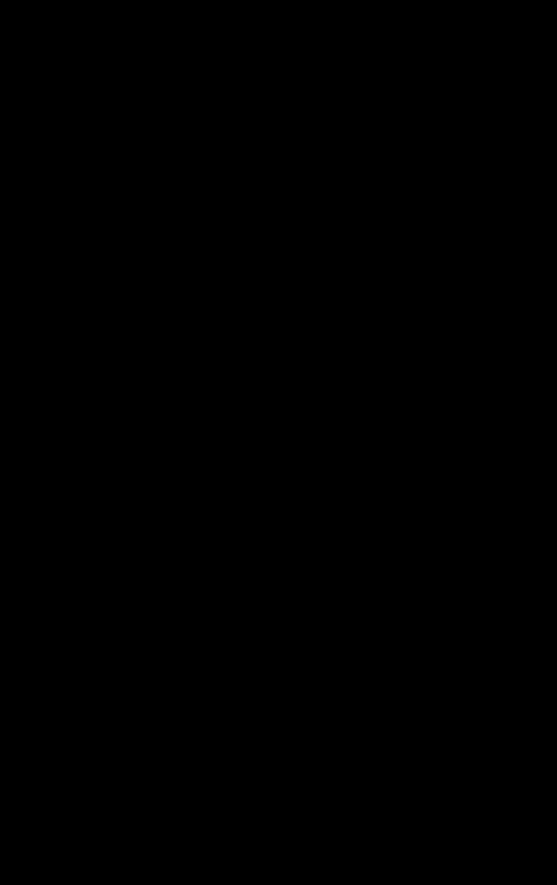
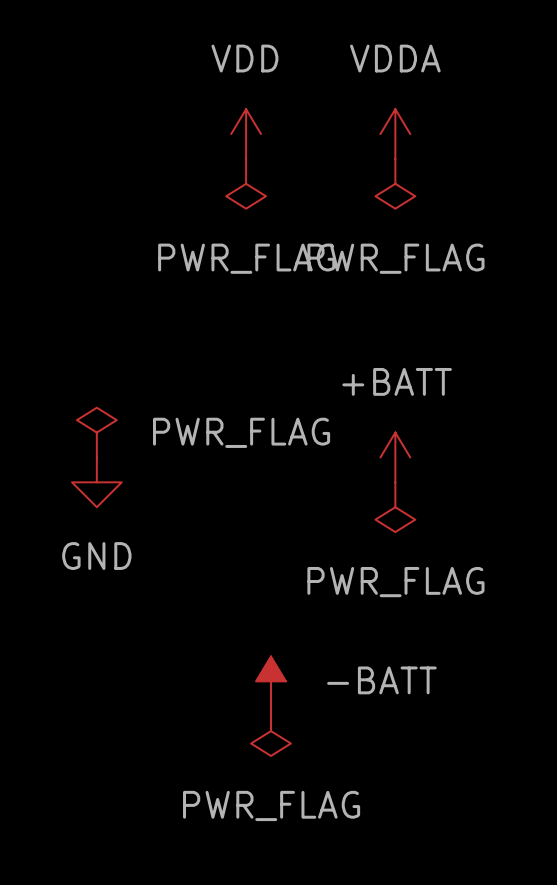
power symbol: none -> VDD (246, 134)
power symbol: none -> VDDA (395, 134)
power symbol: none -> PWR_FLAG (246, 183)
power symbol: none -> PWR_FLAG (395, 183)
power symbol: none -> PWR_FLAG (96, 432)
power symbol: none -> +BATT (395, 457)
power symbol: none -> GND (96, 482)
power symbol: none -> PWR_FLAG (395, 507)
power symbol: none -> -BATT (270, 681)
power symbol: none -> PWR_FLAG (270, 731)

